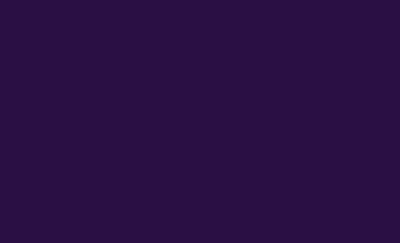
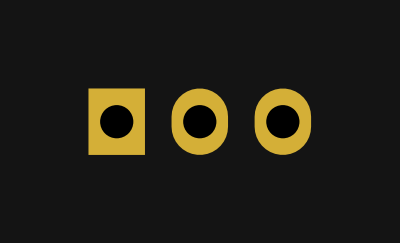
part: none -> (199, 121)

